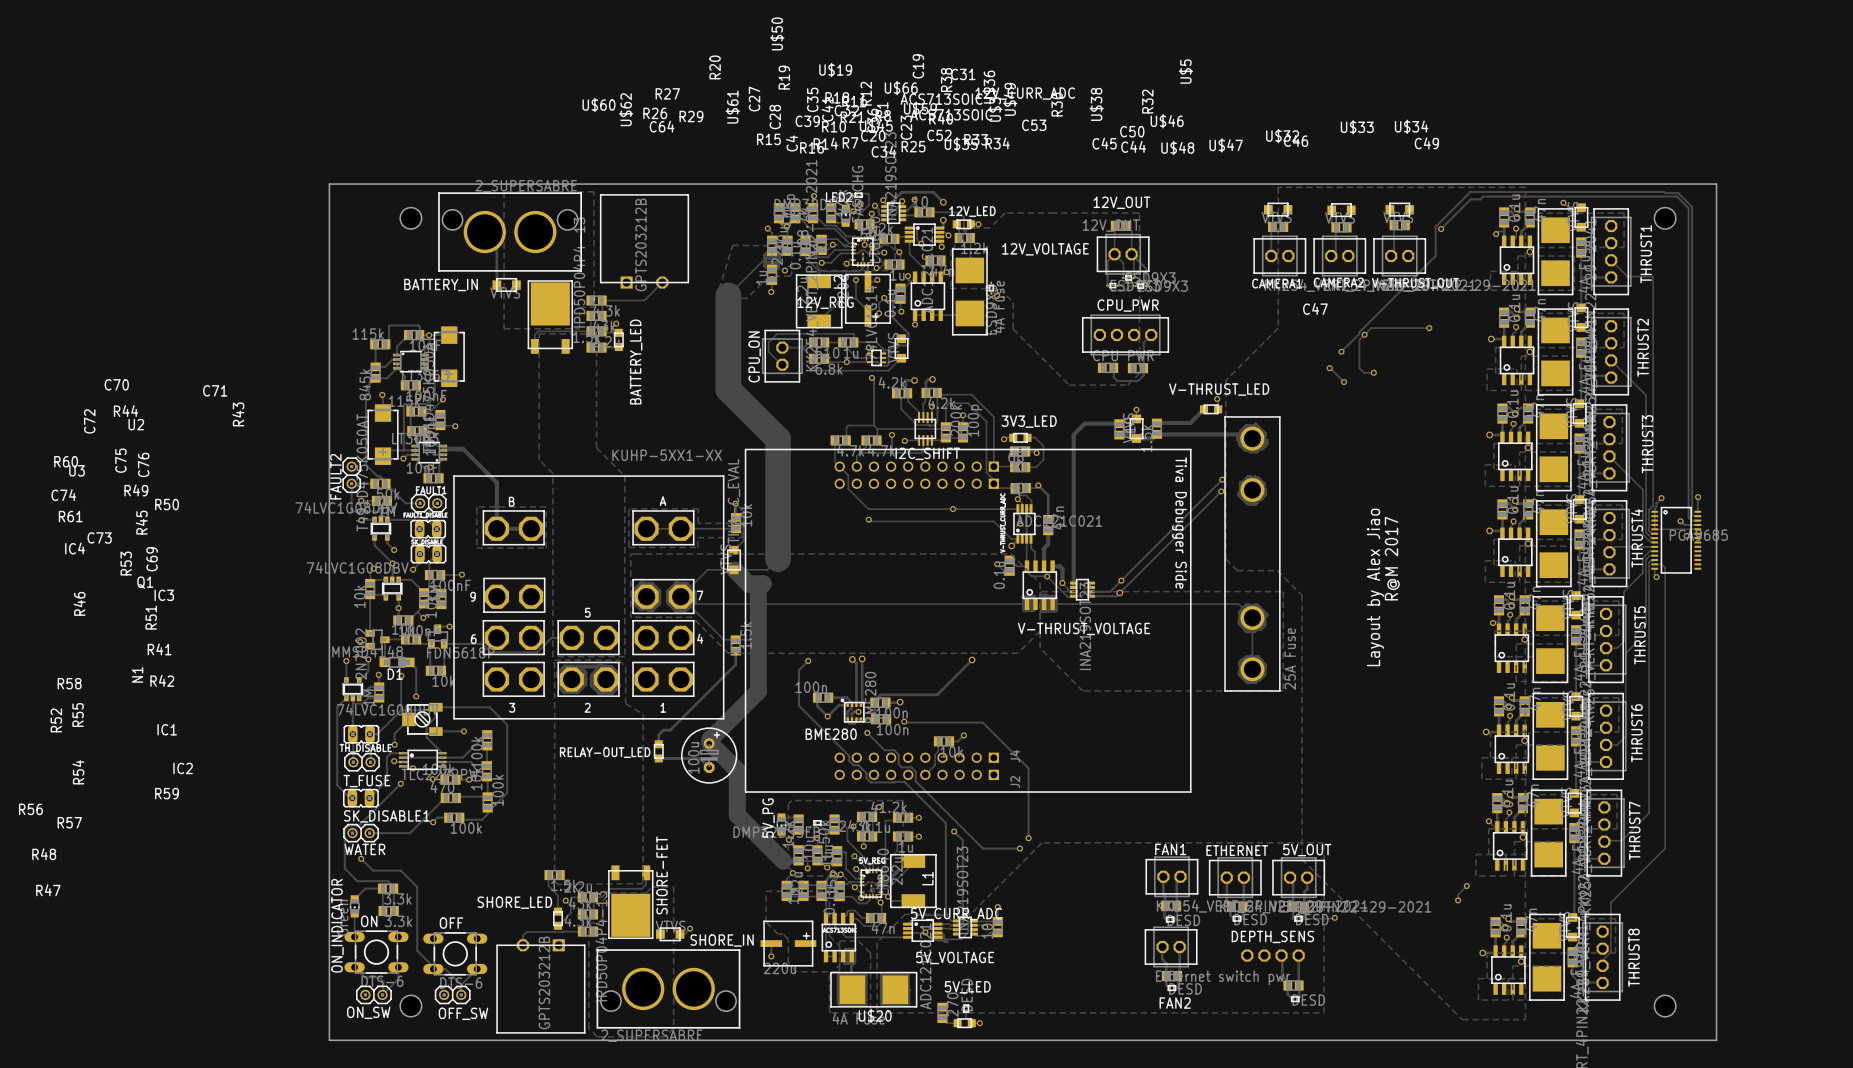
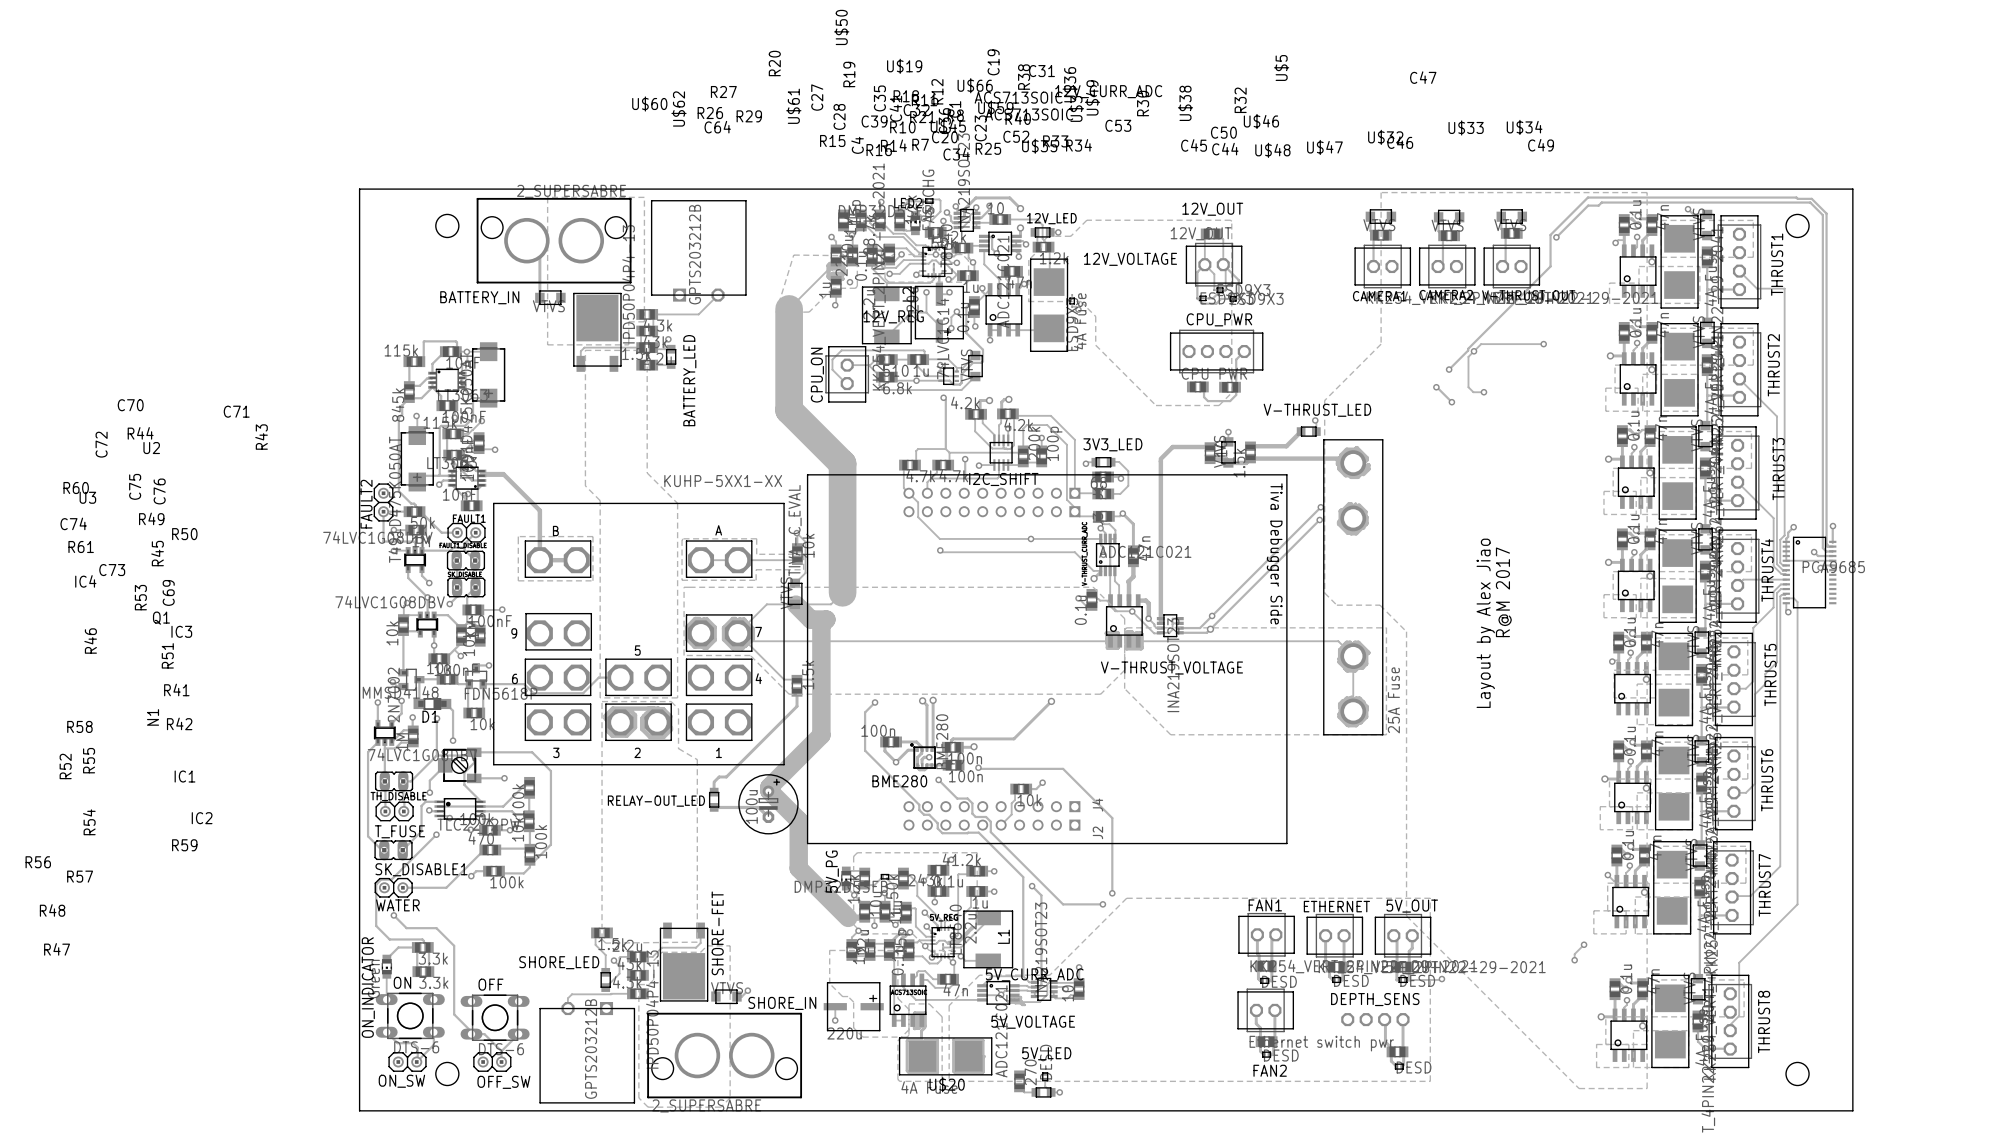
C47 name position: C47 (1315, 308) -> C47 (1423, 77)

